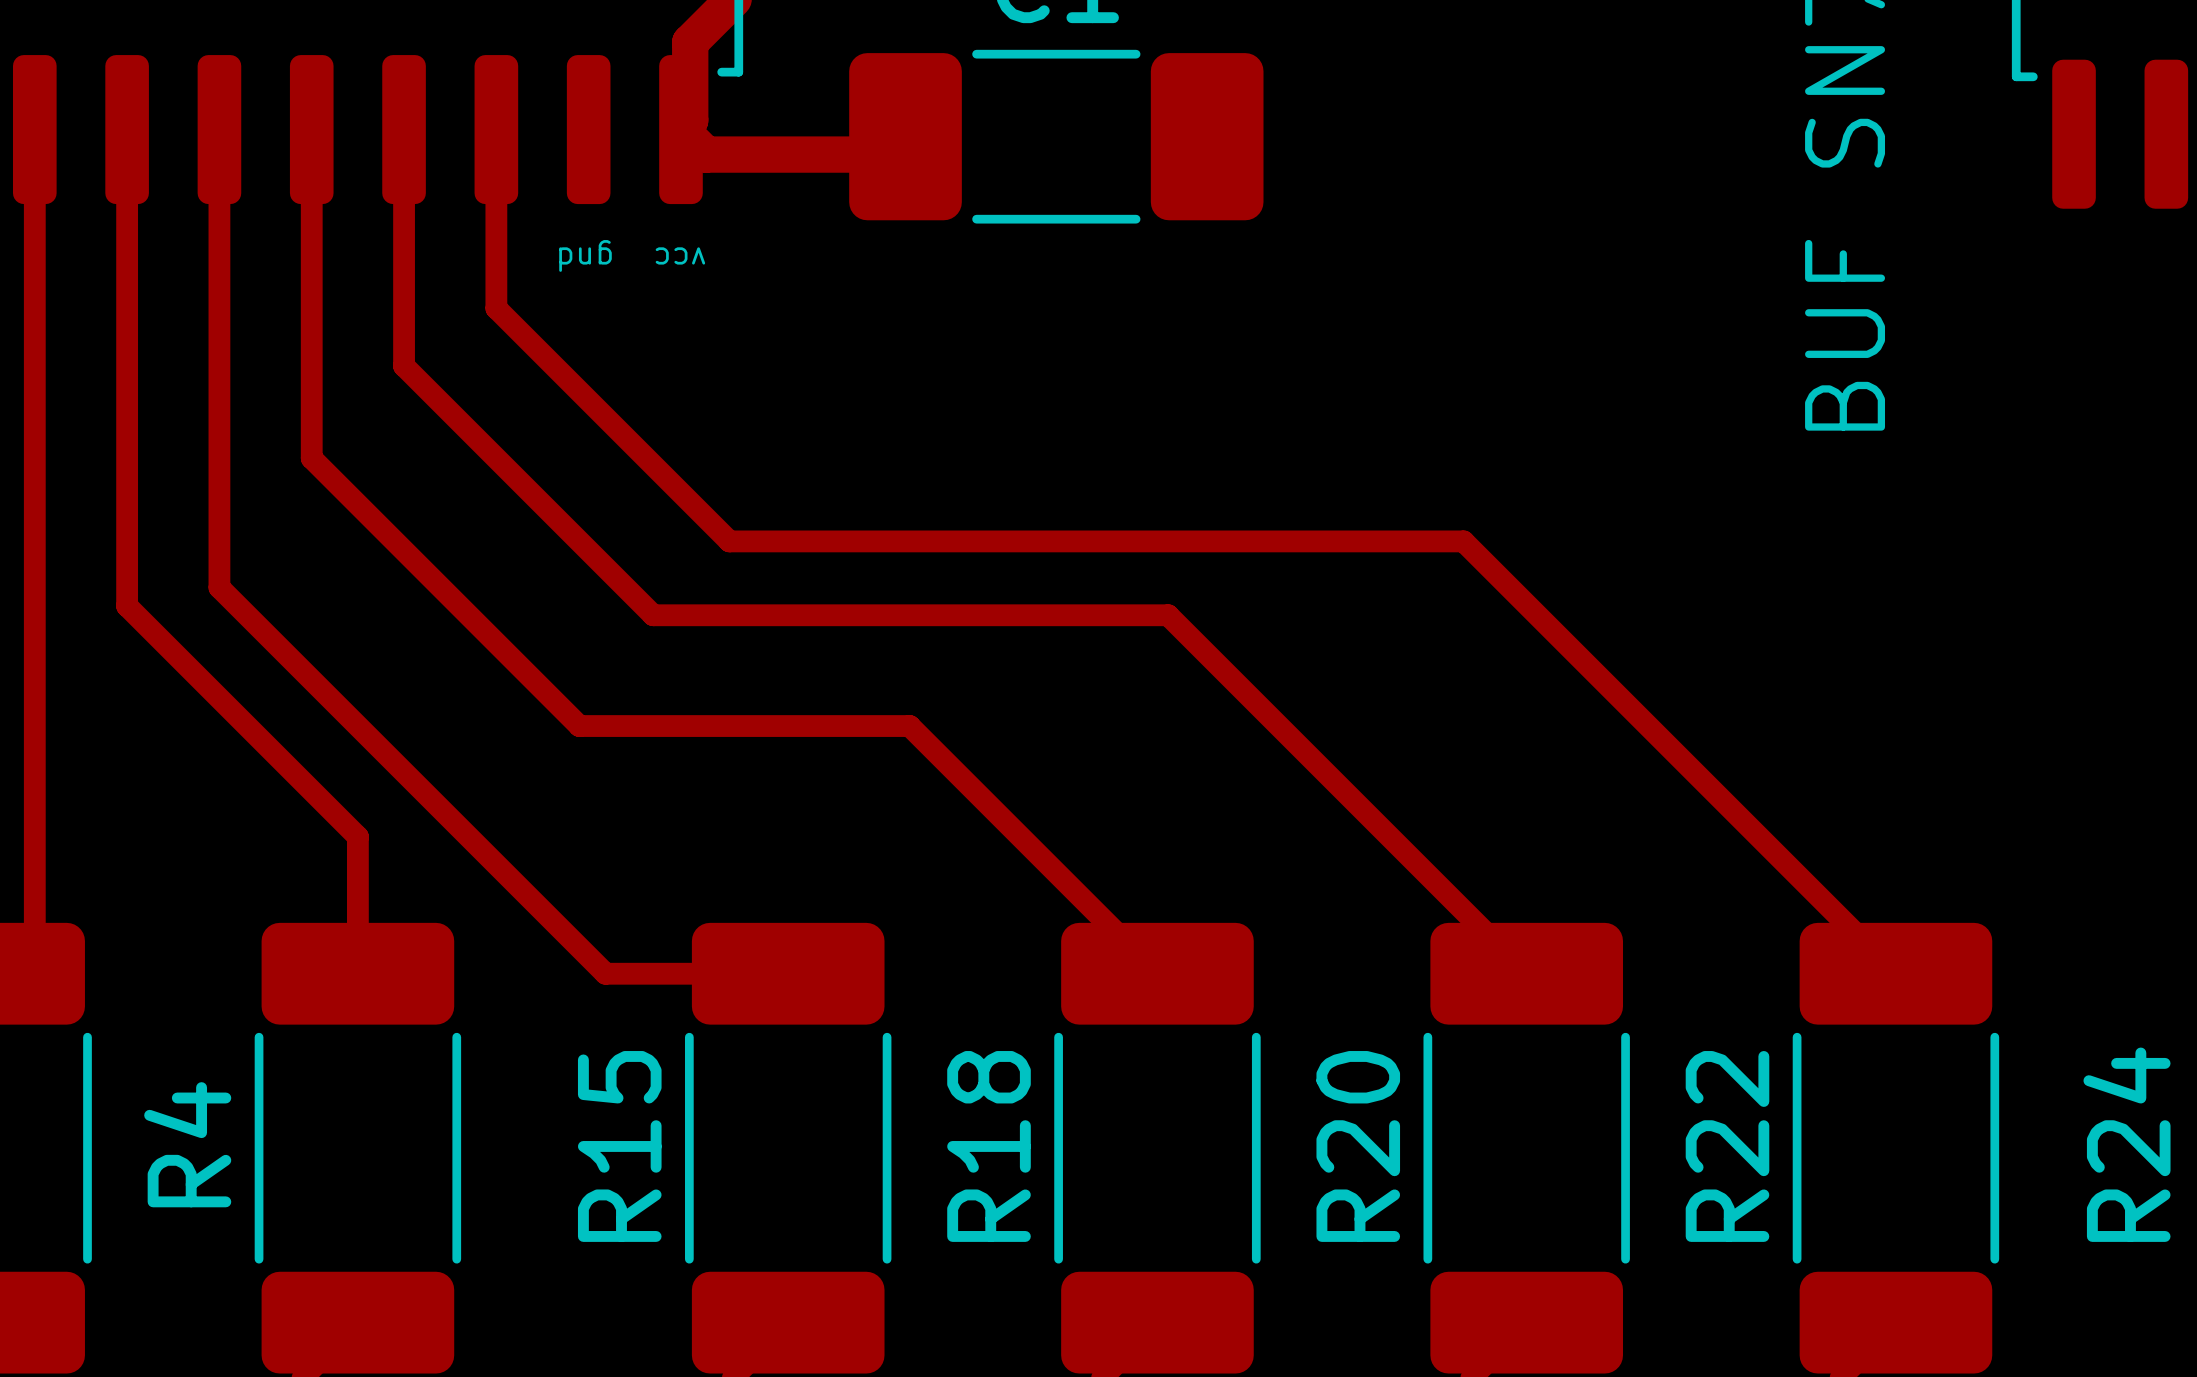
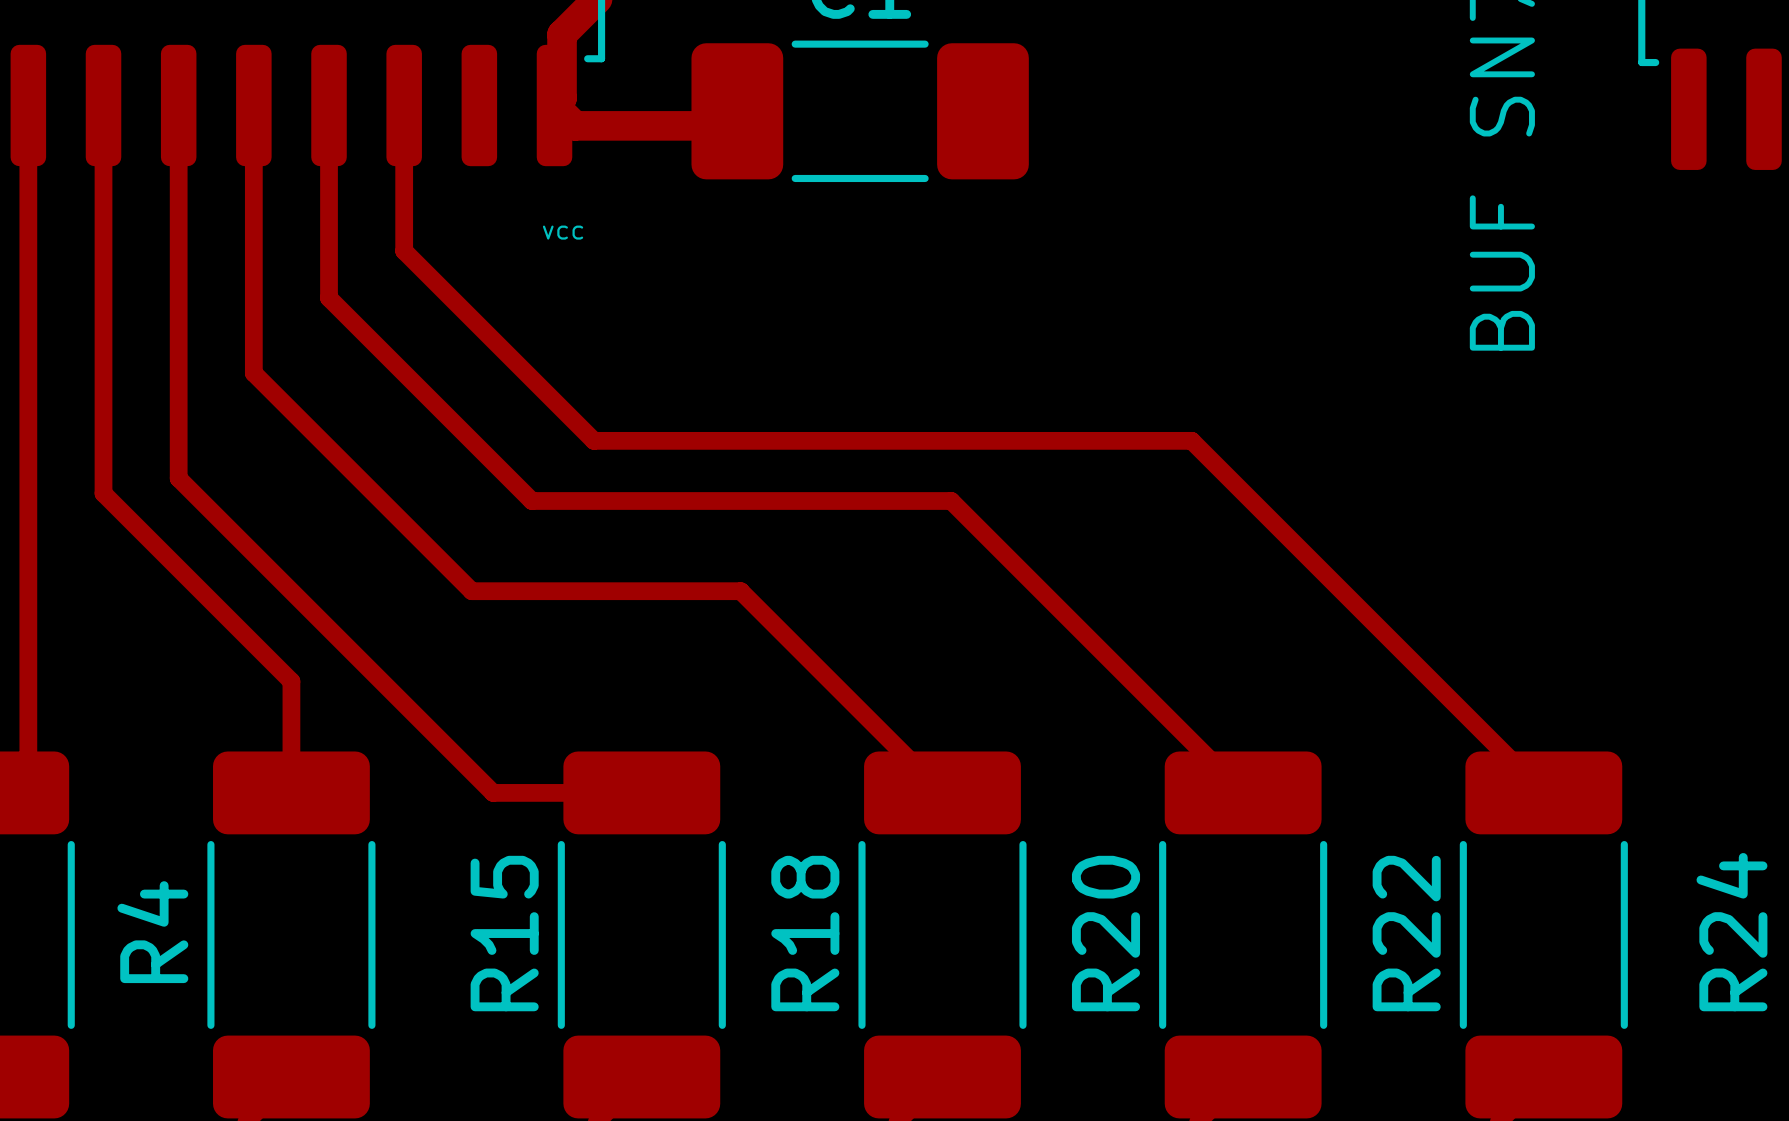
text: gnd (585, 255) -> none
text rotation: 0° (680, 255) -> 180° (563, 232)

